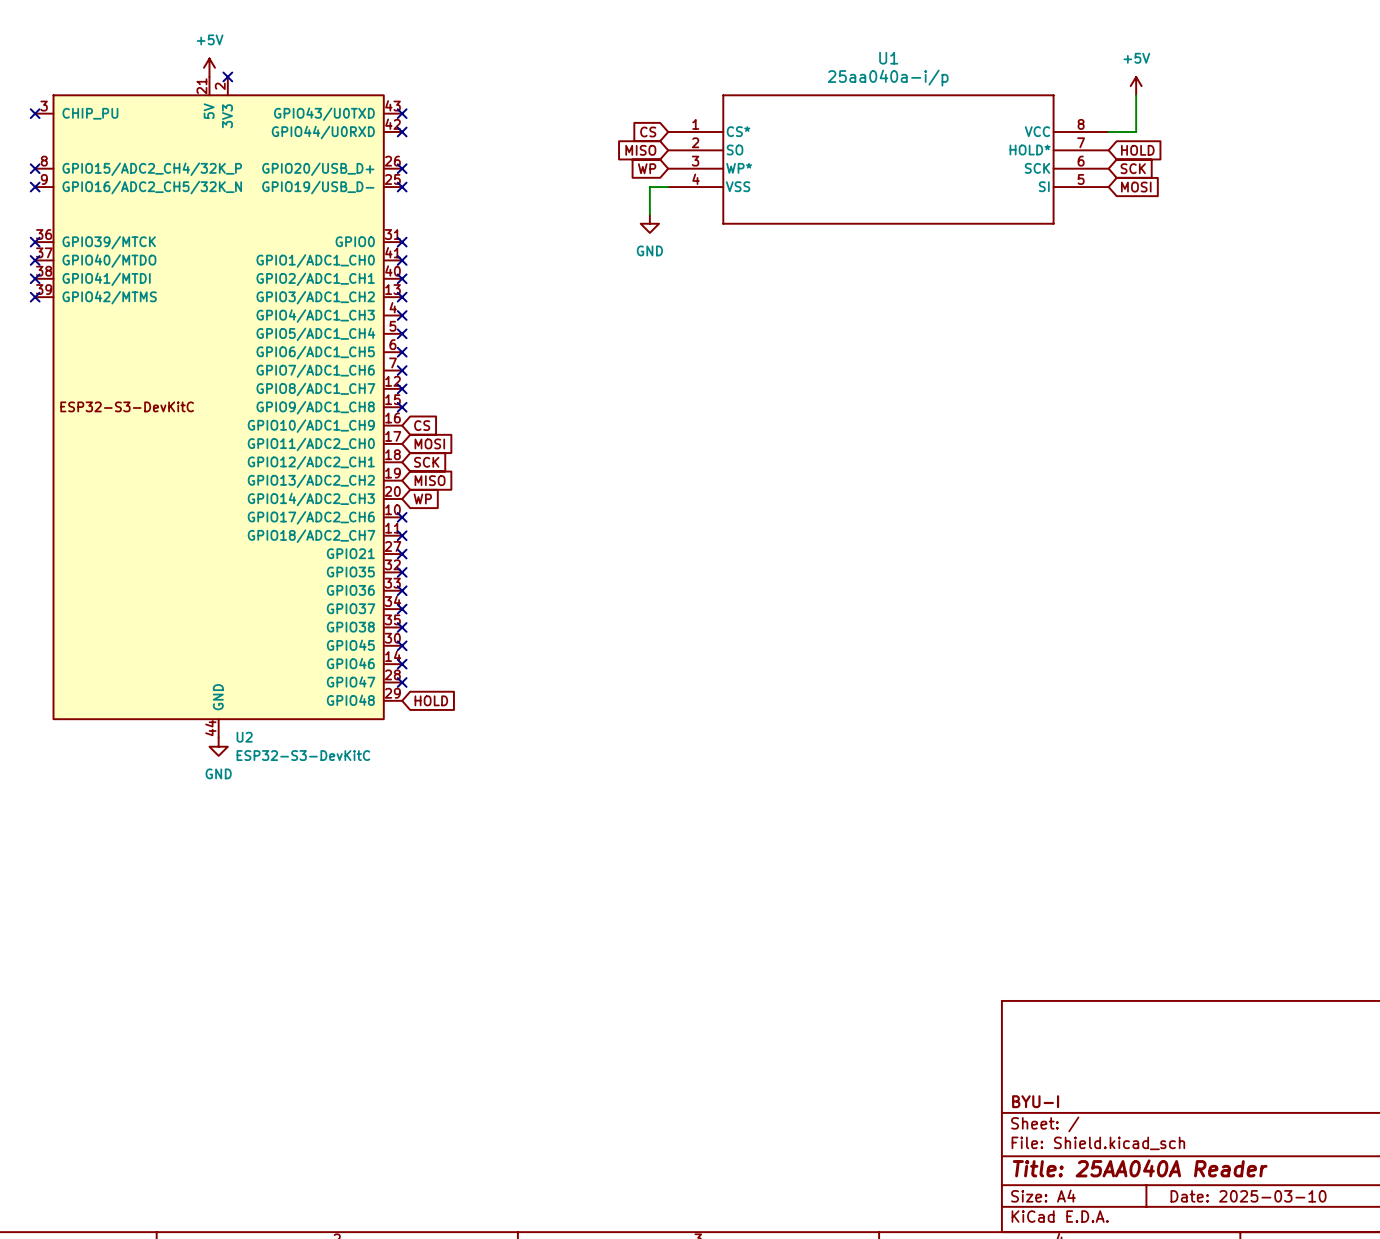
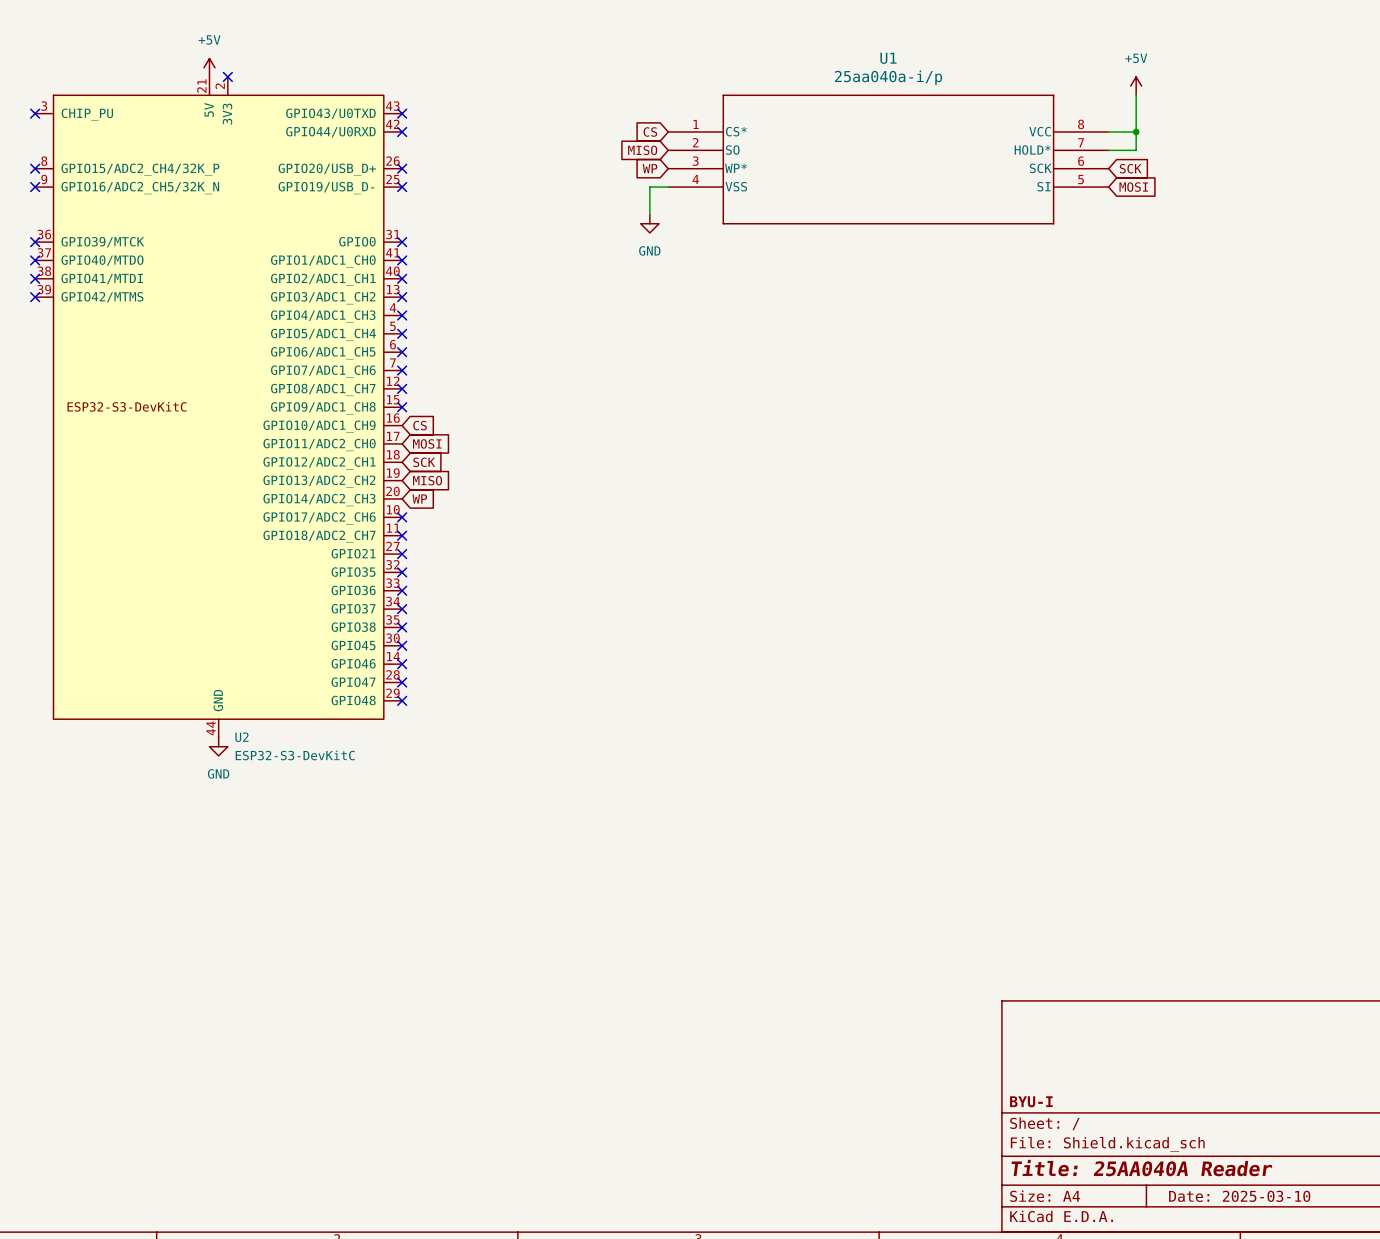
wire: none -> (1136, 132) (1136, 150) (1108, 150)
junction: none -> (1136, 132)
global label: HOLD (1137, 150) -> none
no-connect mark: none -> (402, 700)
global label: HOLD (431, 700) -> none

